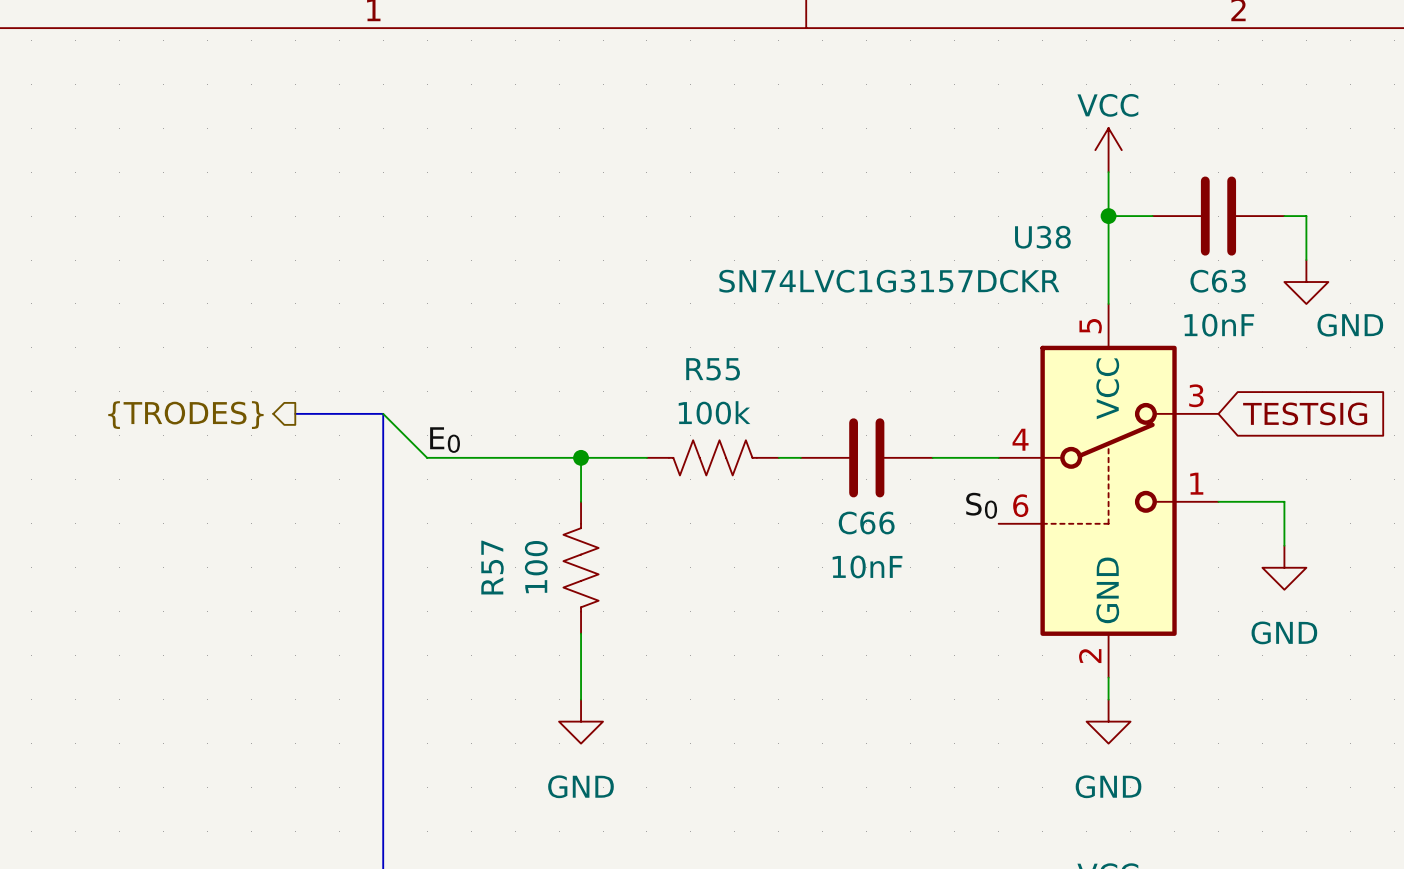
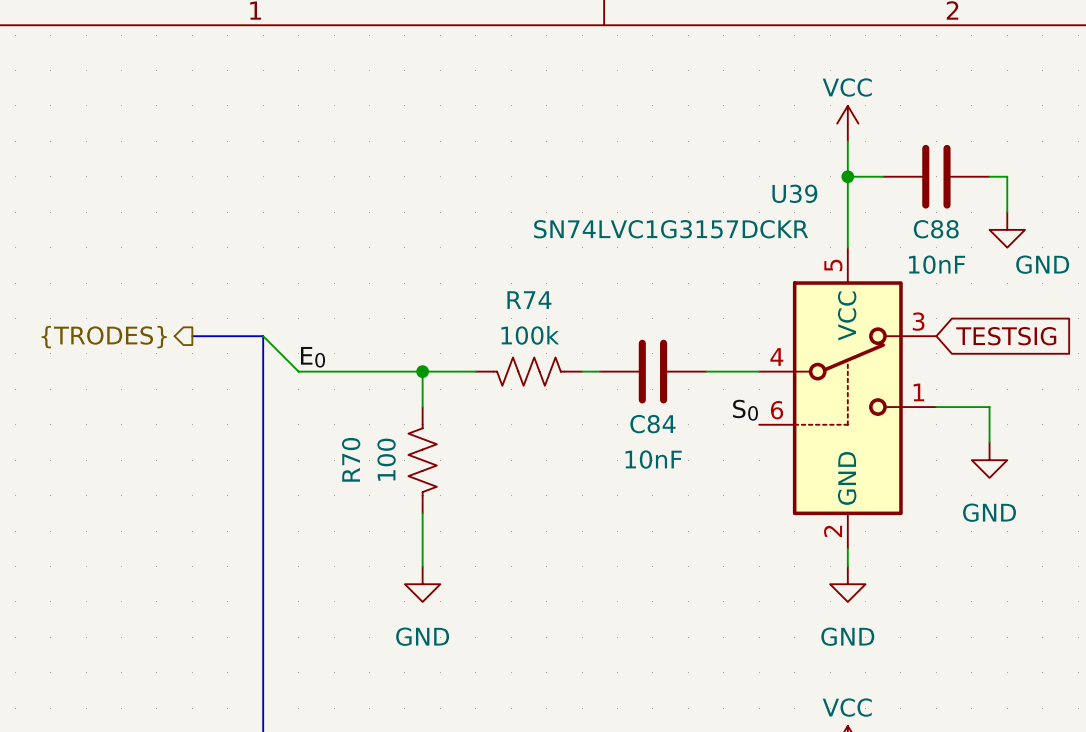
U38 name: U38 (1042, 237) -> U39 (794, 193)
C63 name: C63 (1218, 281) -> C88 (936, 229)
R55 name: R55 (713, 369) -> R74 (529, 300)
C66 name: C66 (866, 522) -> C84 (652, 424)
R57 name: R57 (492, 567) -> R70 (351, 459)

